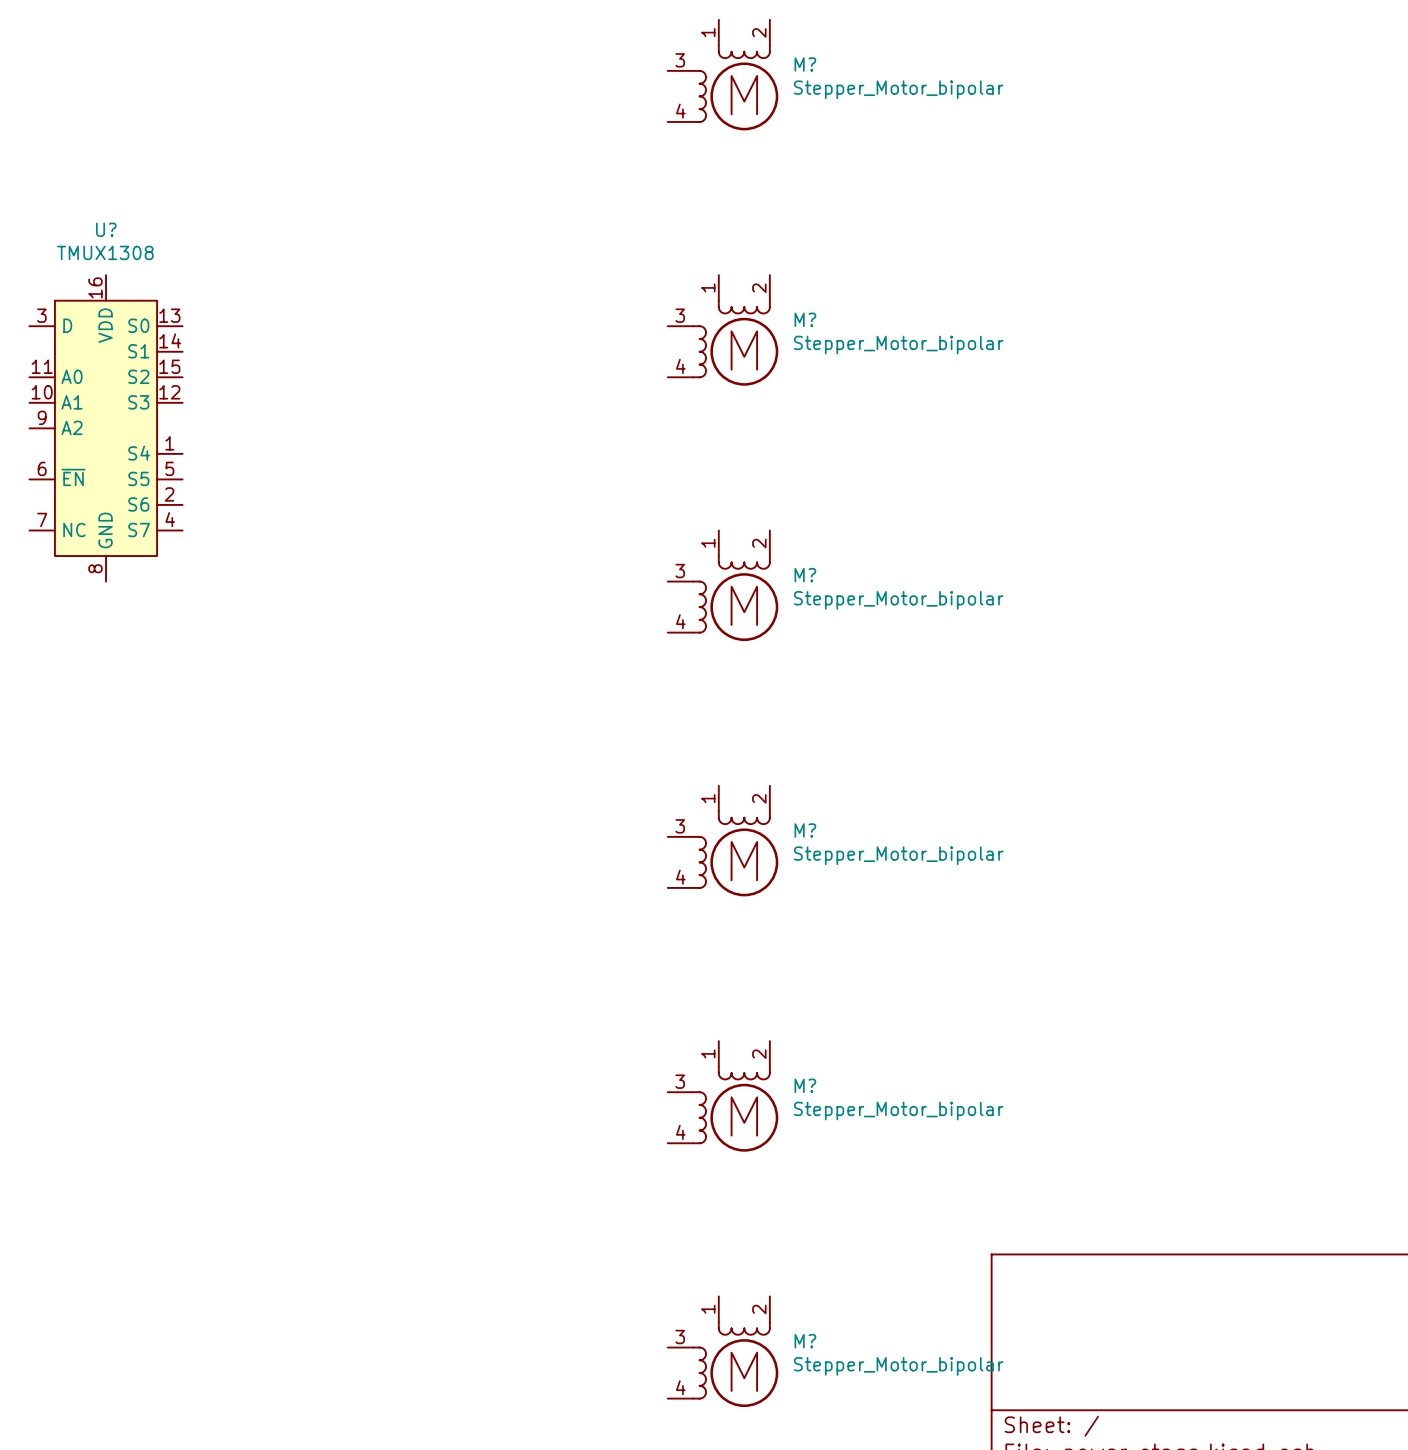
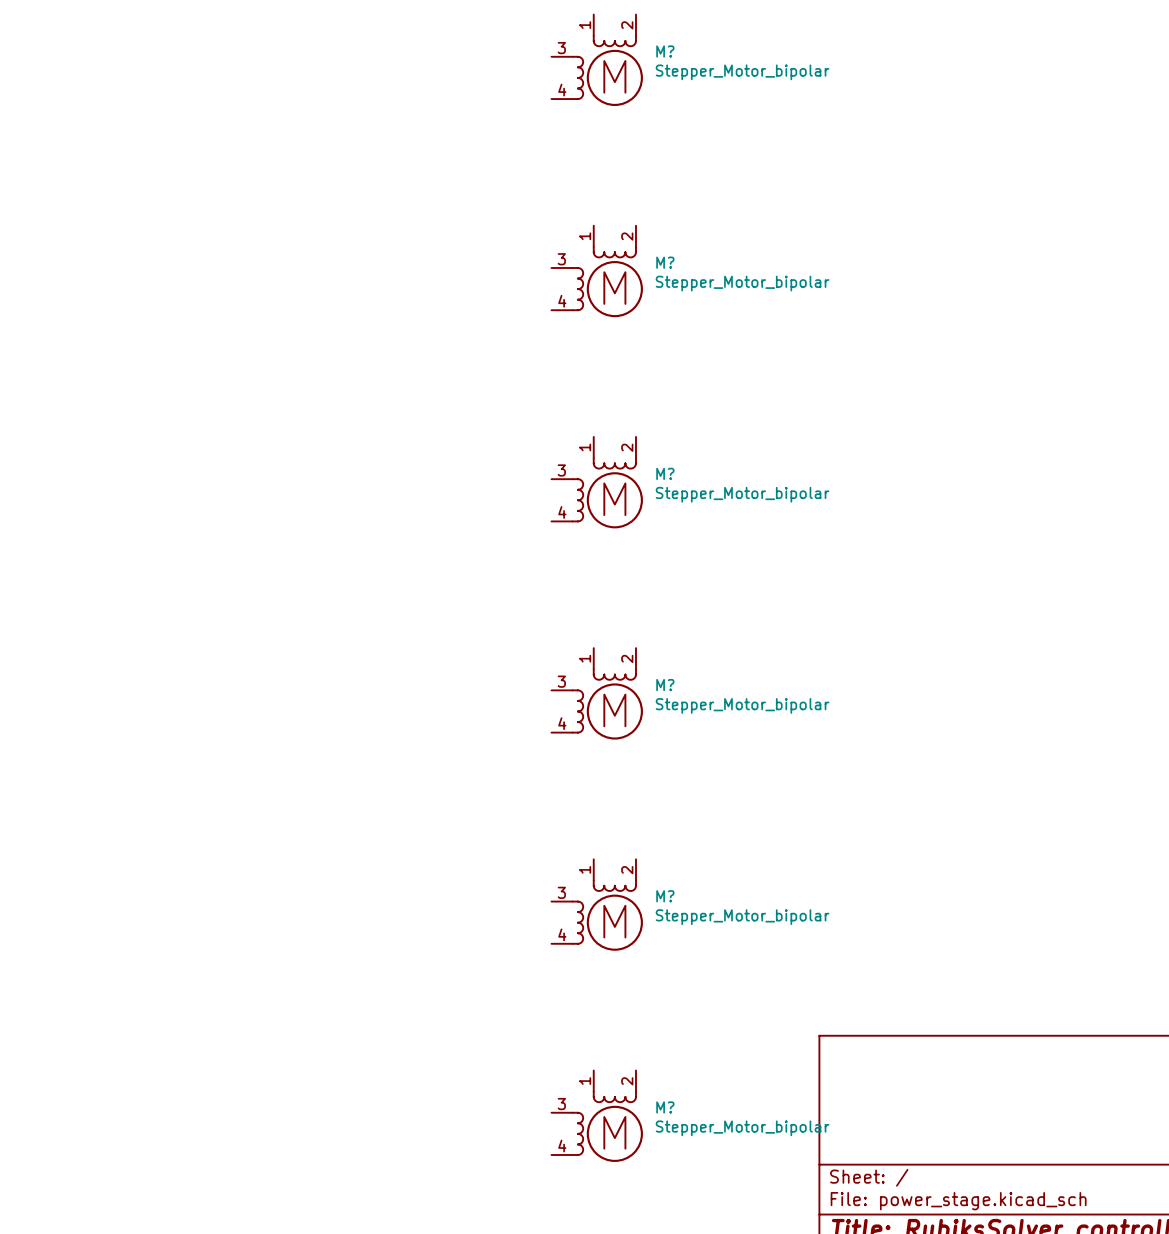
U?: TMUX1308 (106, 428) -> none

